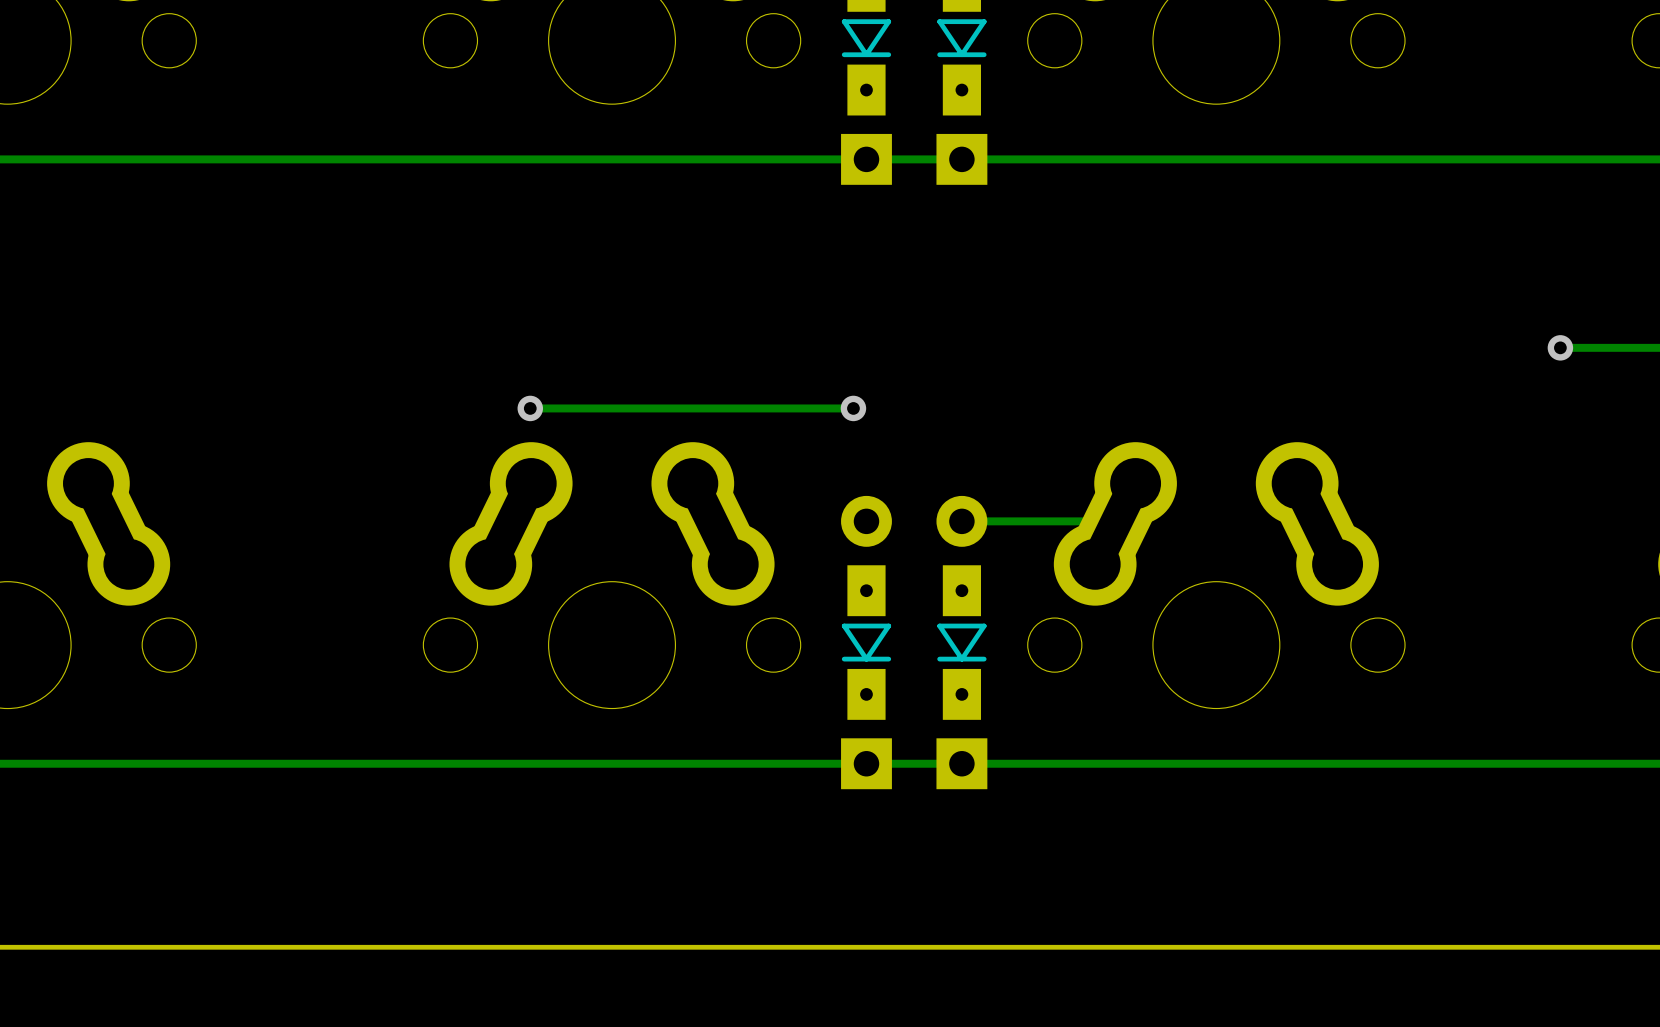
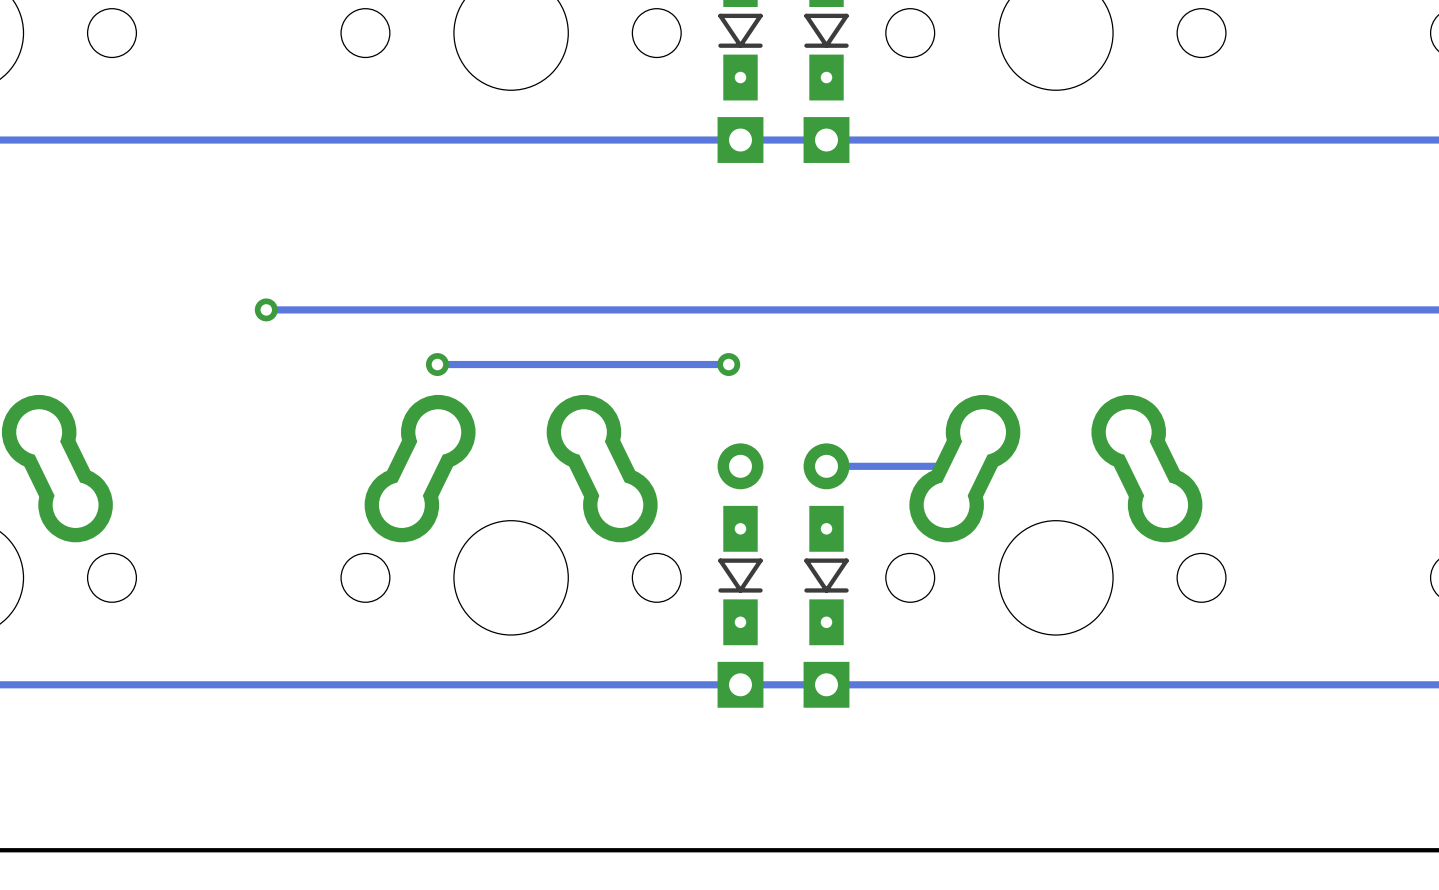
via: none -> (266, 309)
track: none -> (1365, 309) (266, 309)
via: (1560, 347) -> none

